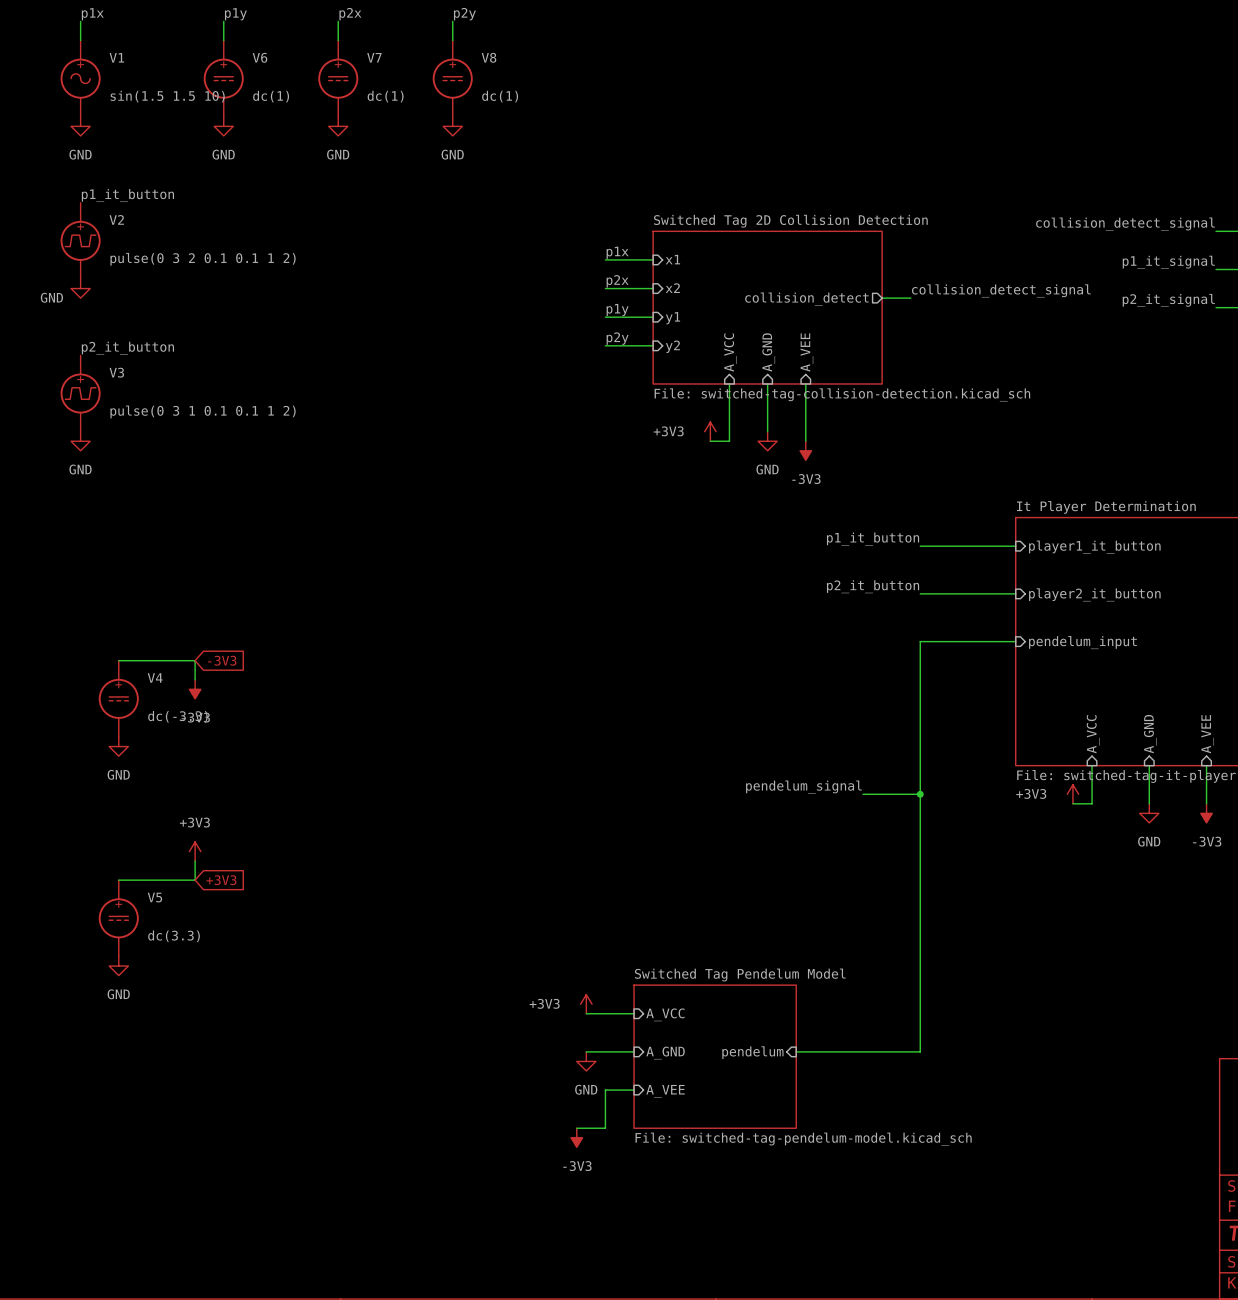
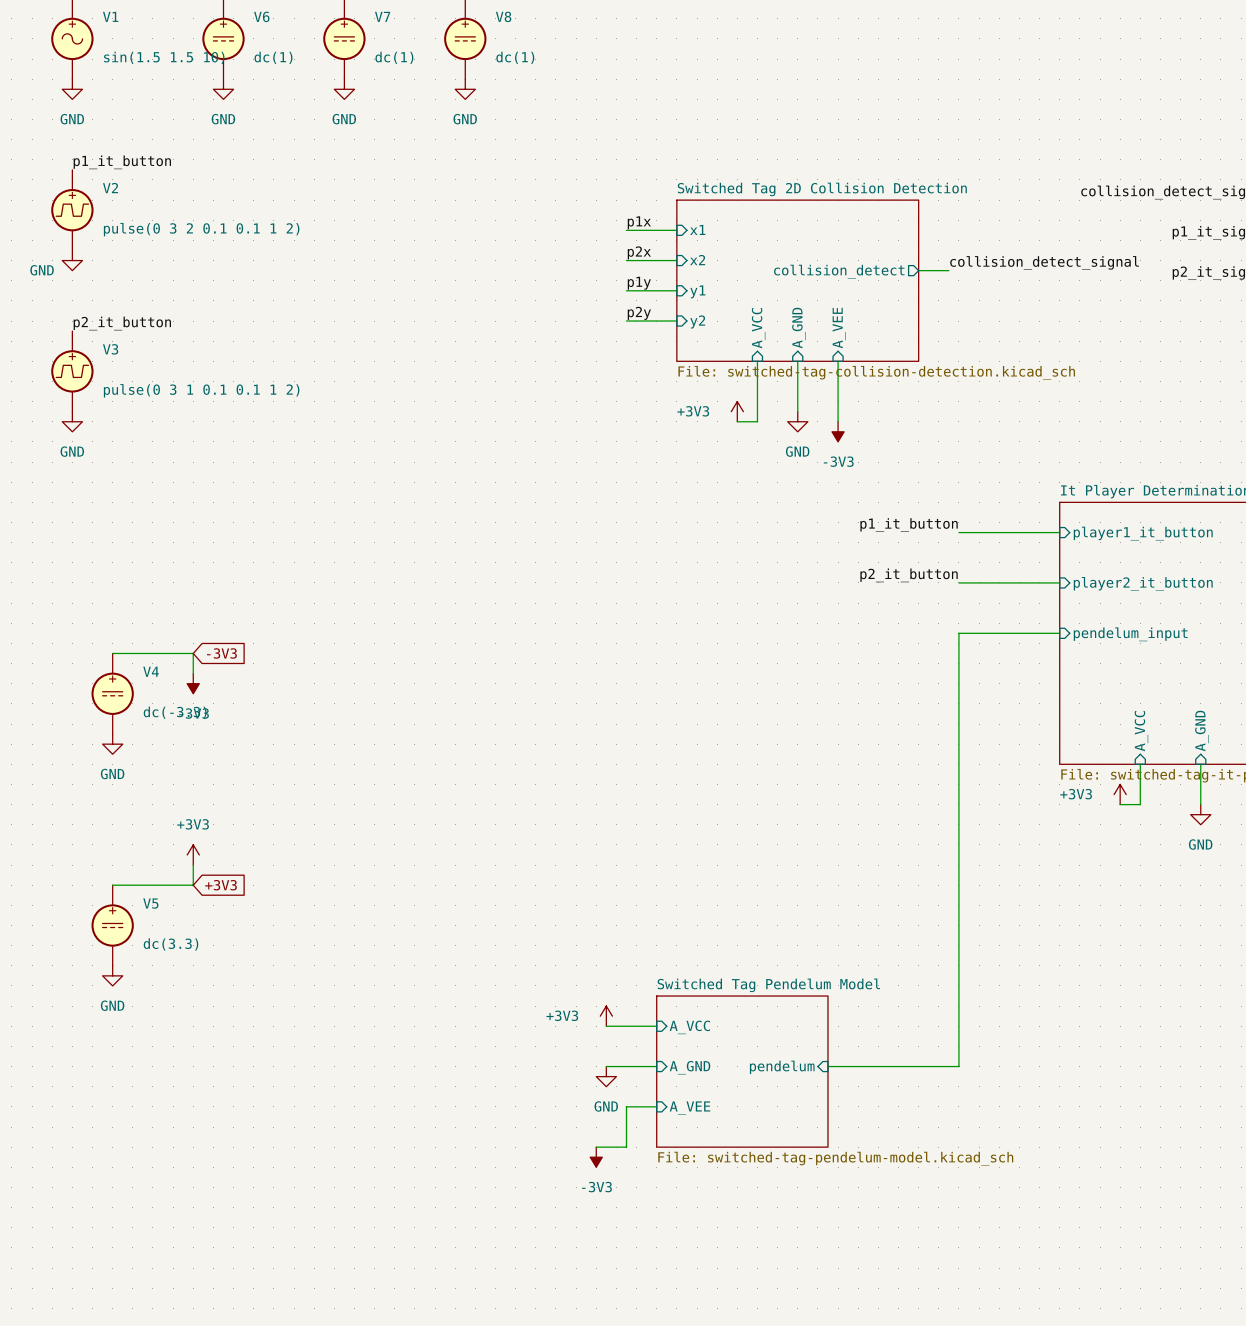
label: pendelum_signal (803, 787) -> none
wire: (863, 794) (920, 794) -> none
junction: (920, 794) -> none

